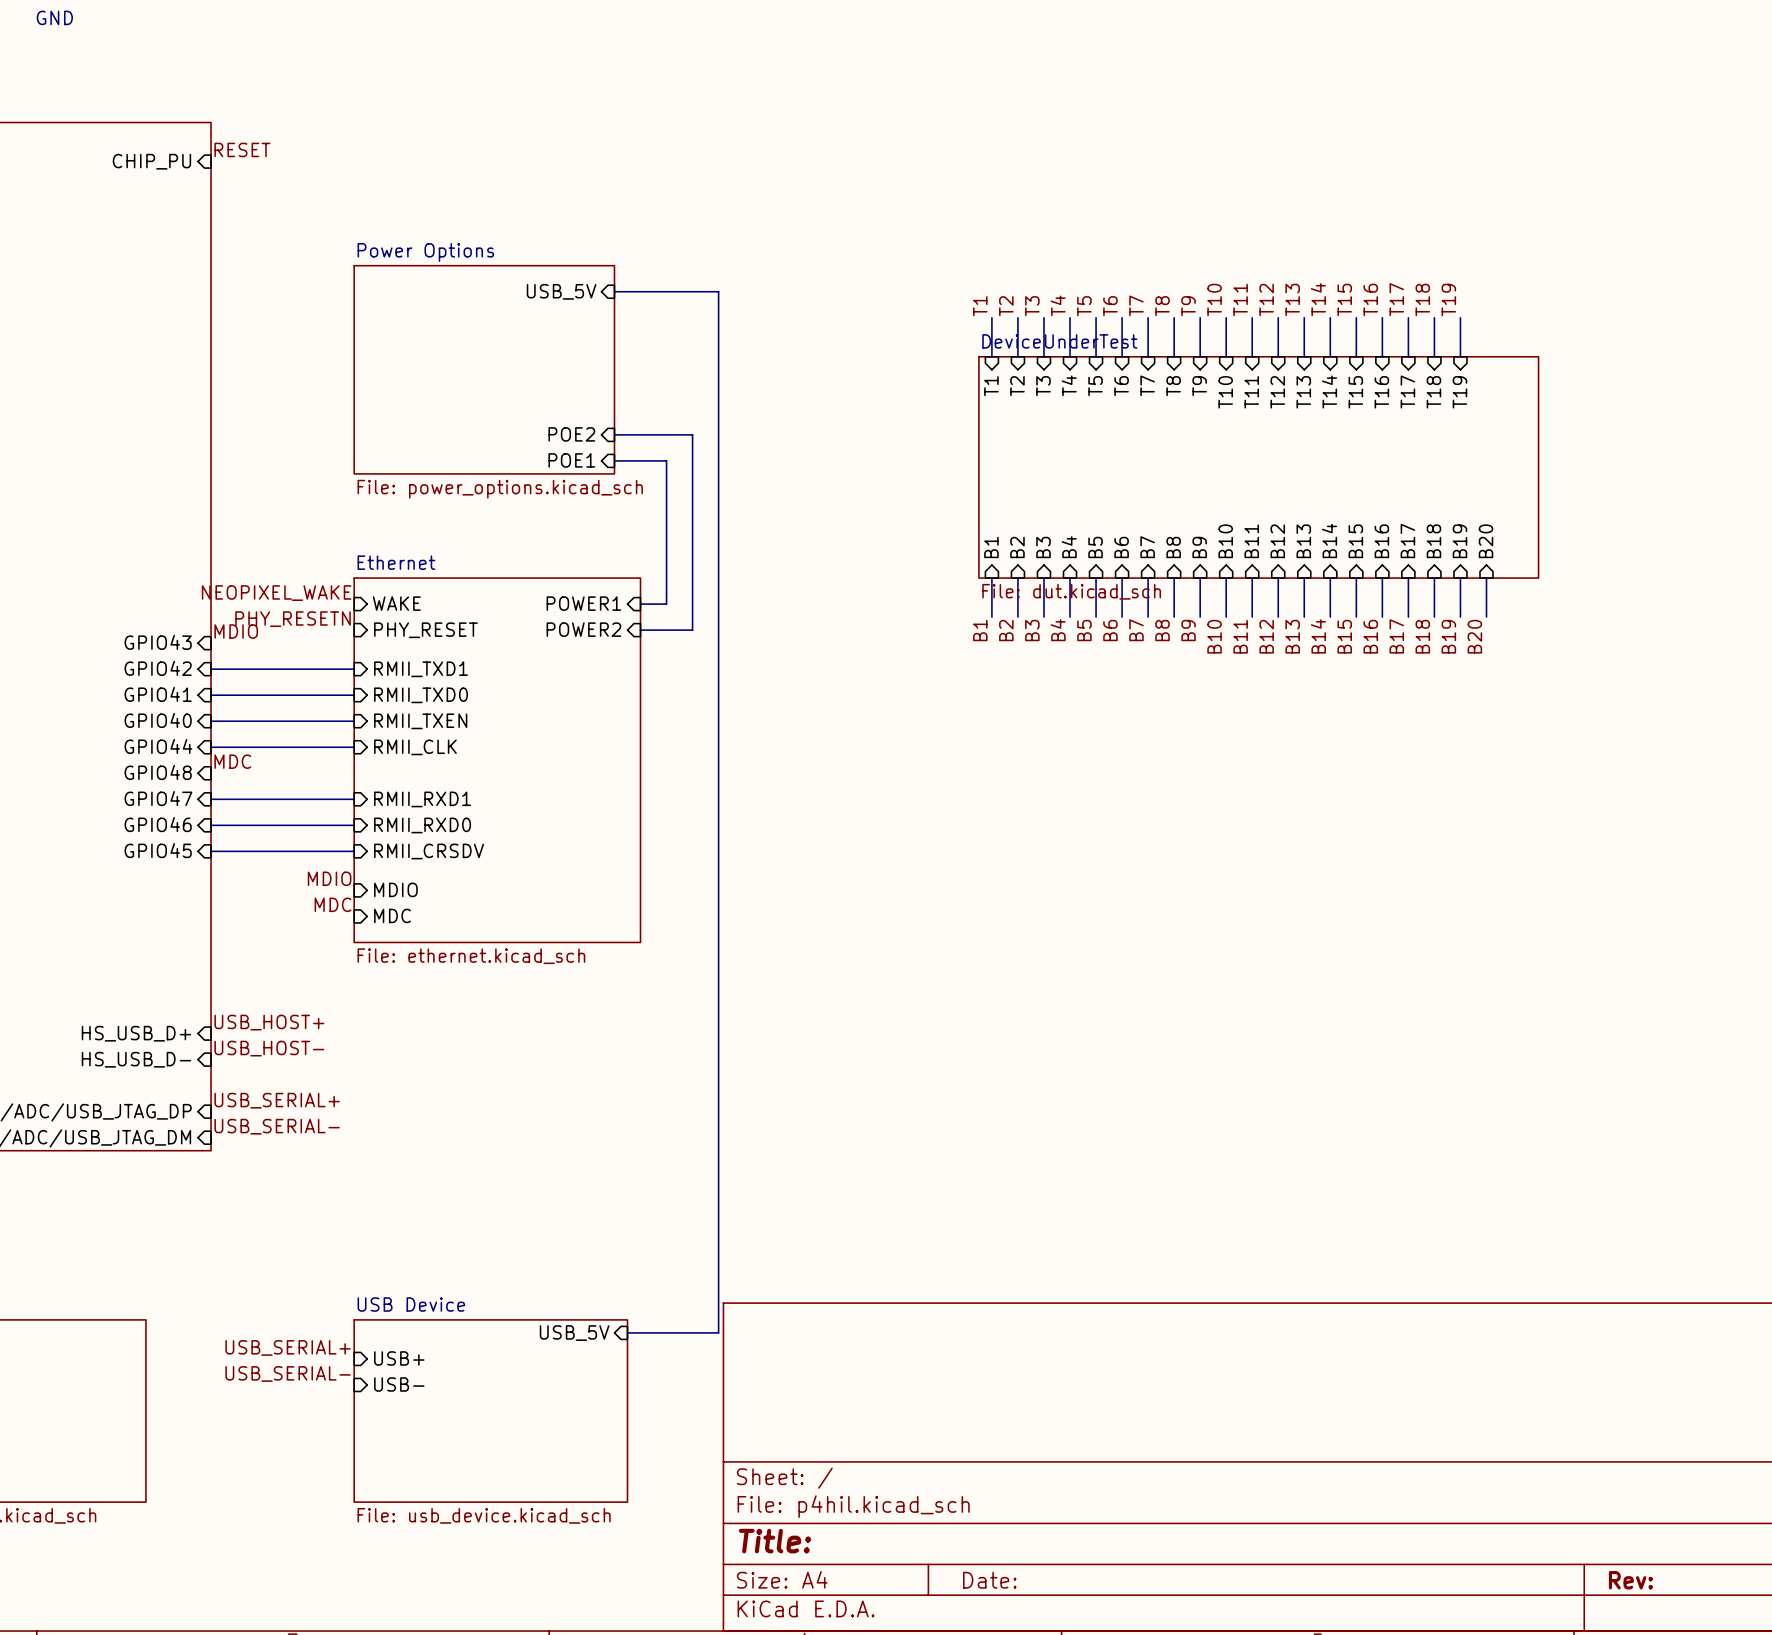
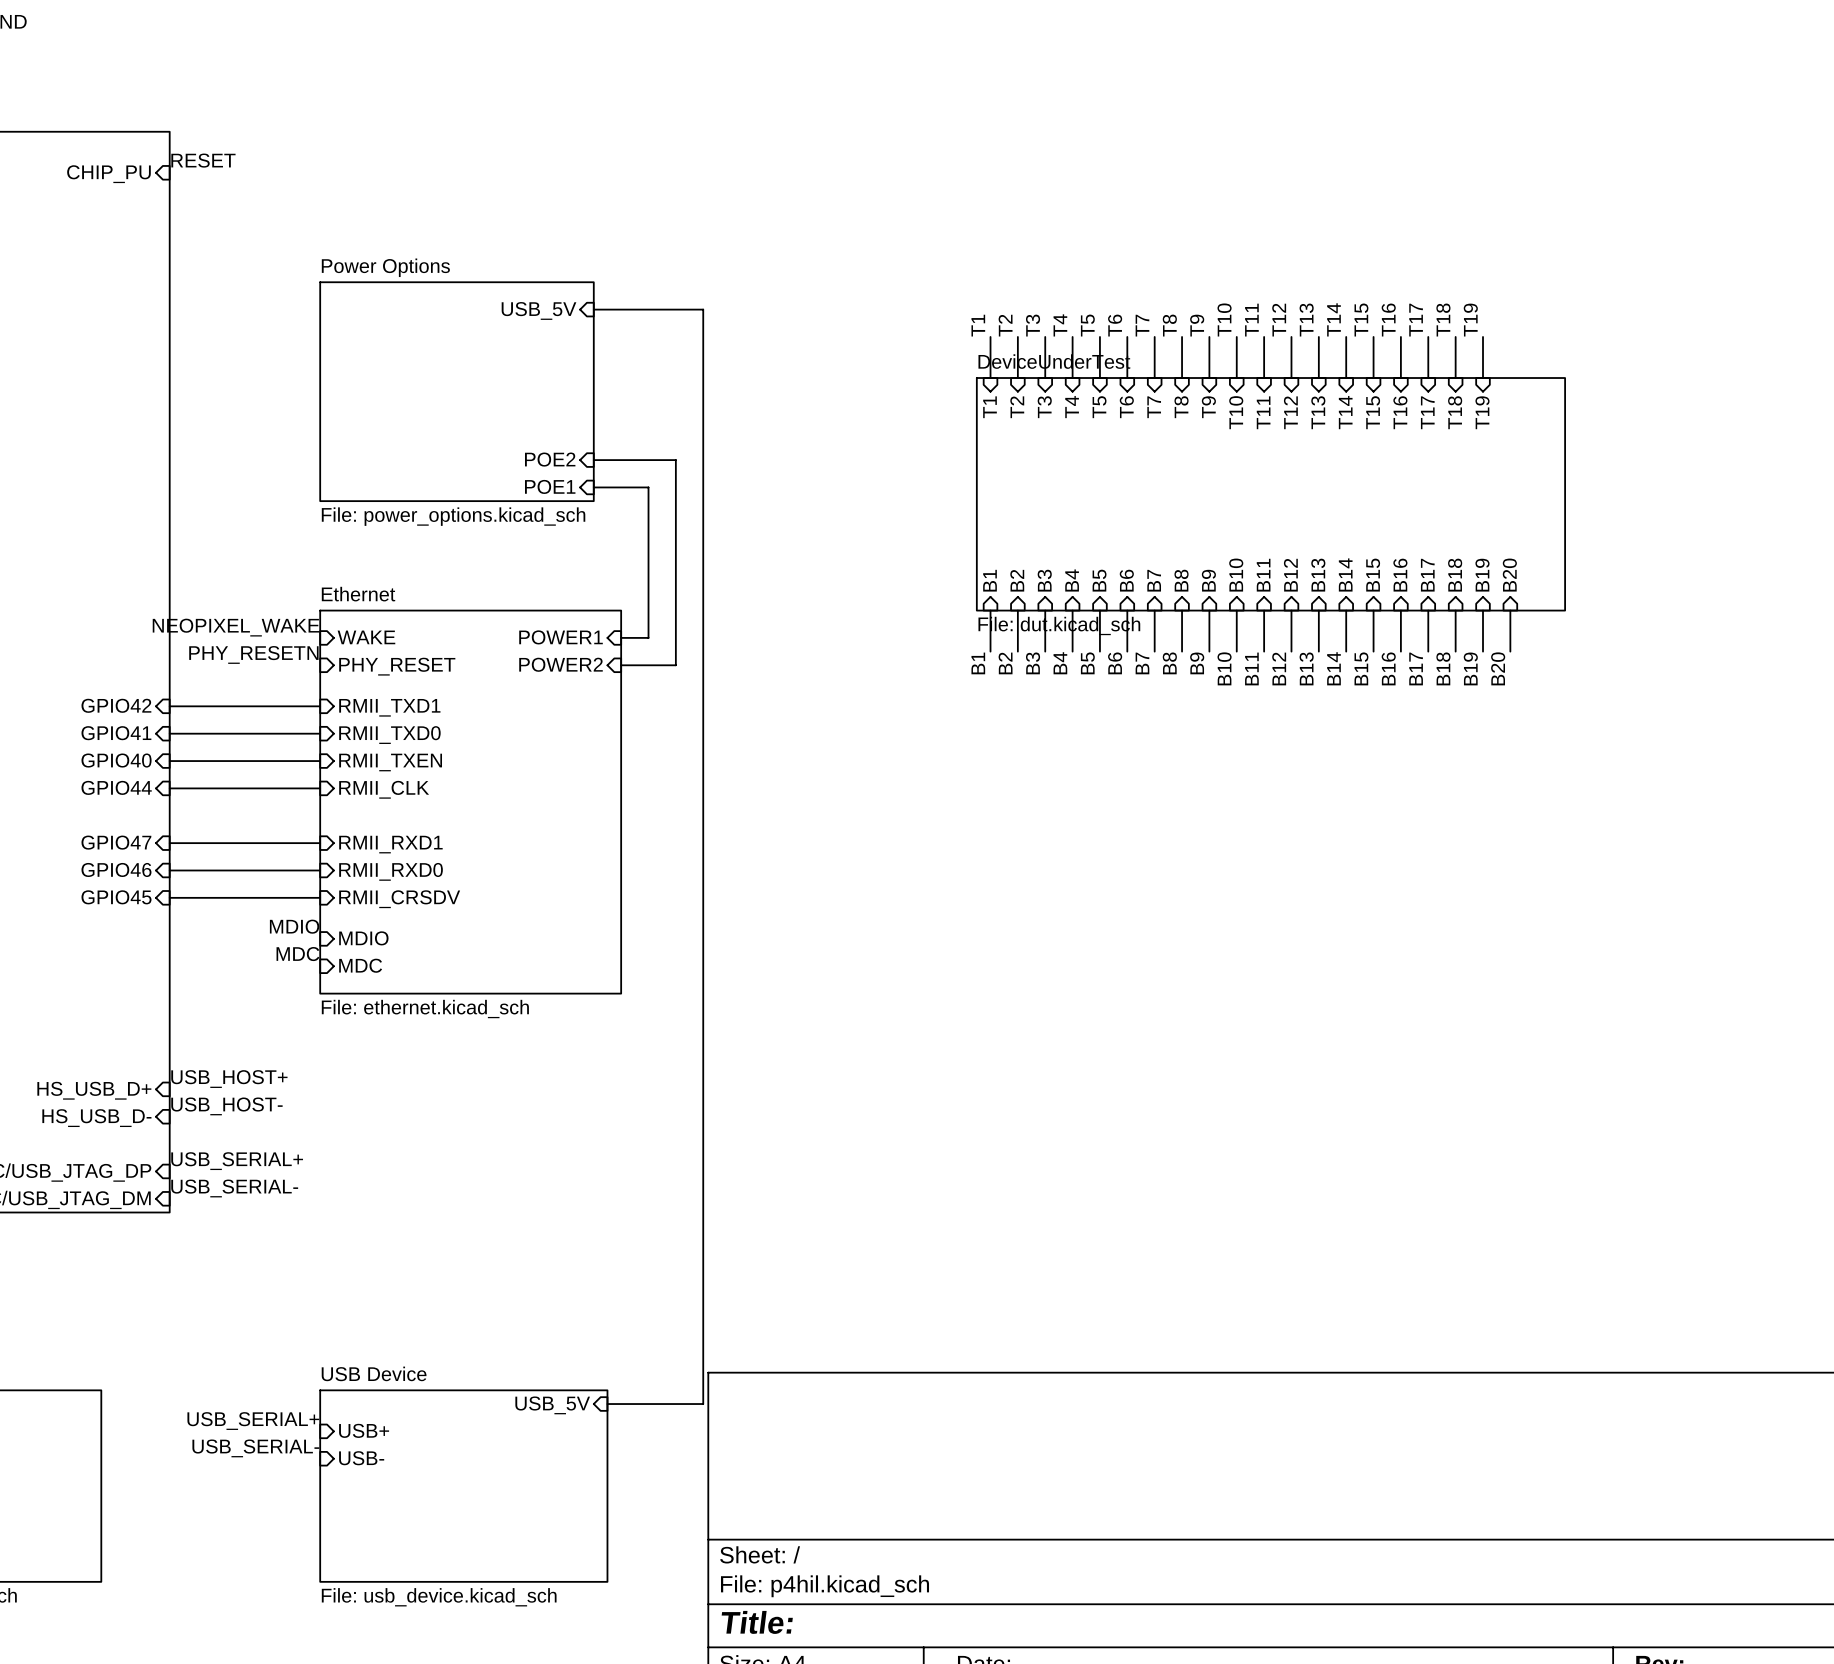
label: MDIO (236, 631) -> none
sheet pin: GPIO43 (158, 642) -> none
label: MDC (232, 761) -> none
sheet pin: GPIO48 (158, 772) -> none

